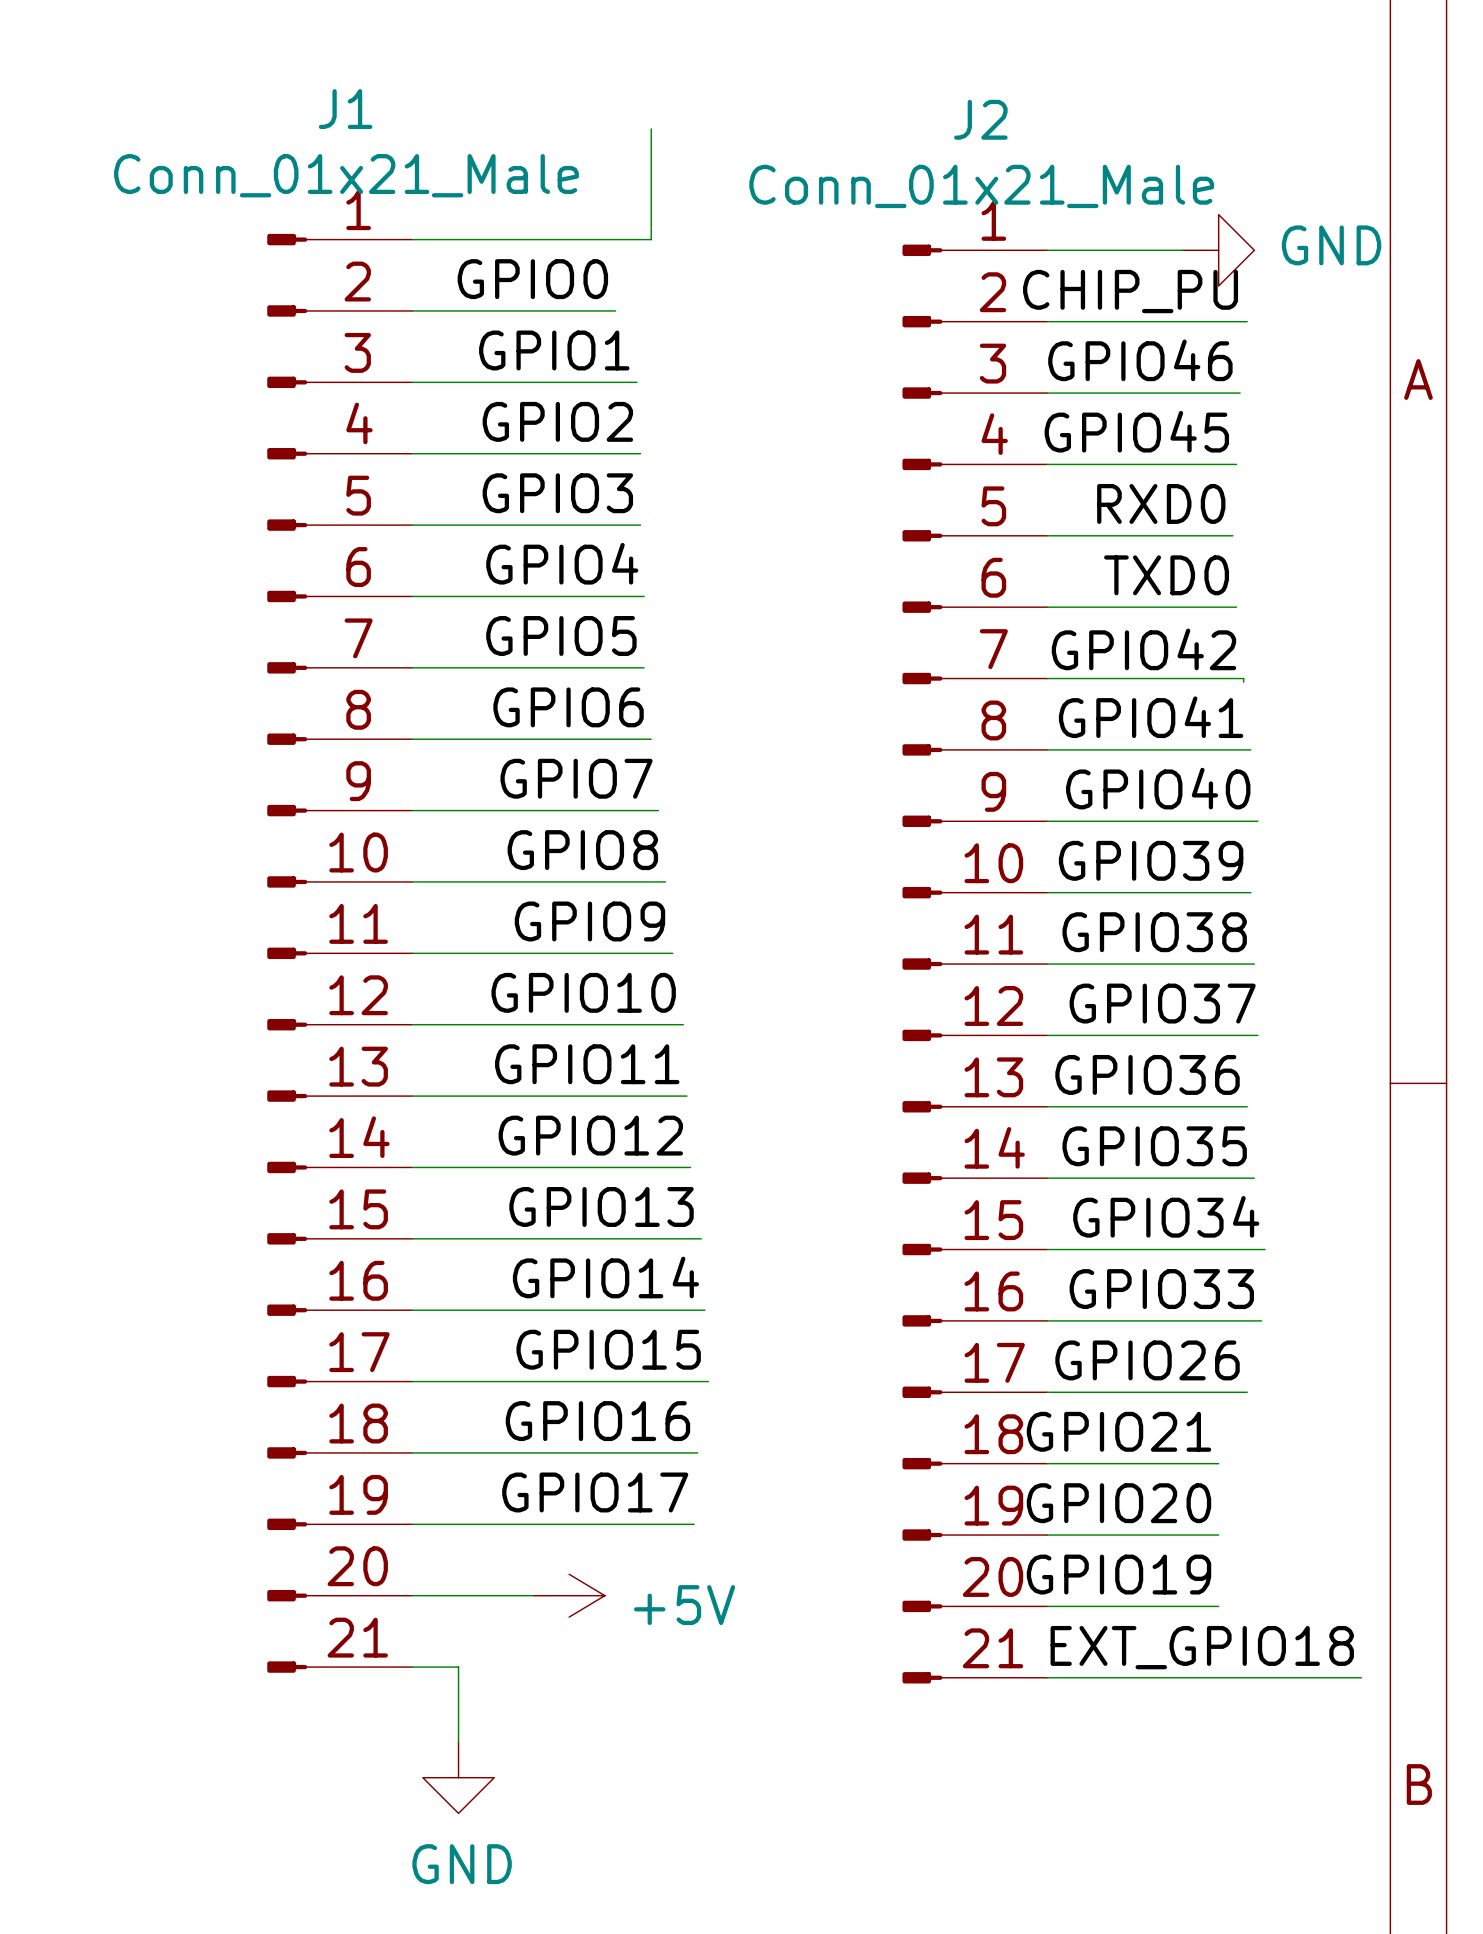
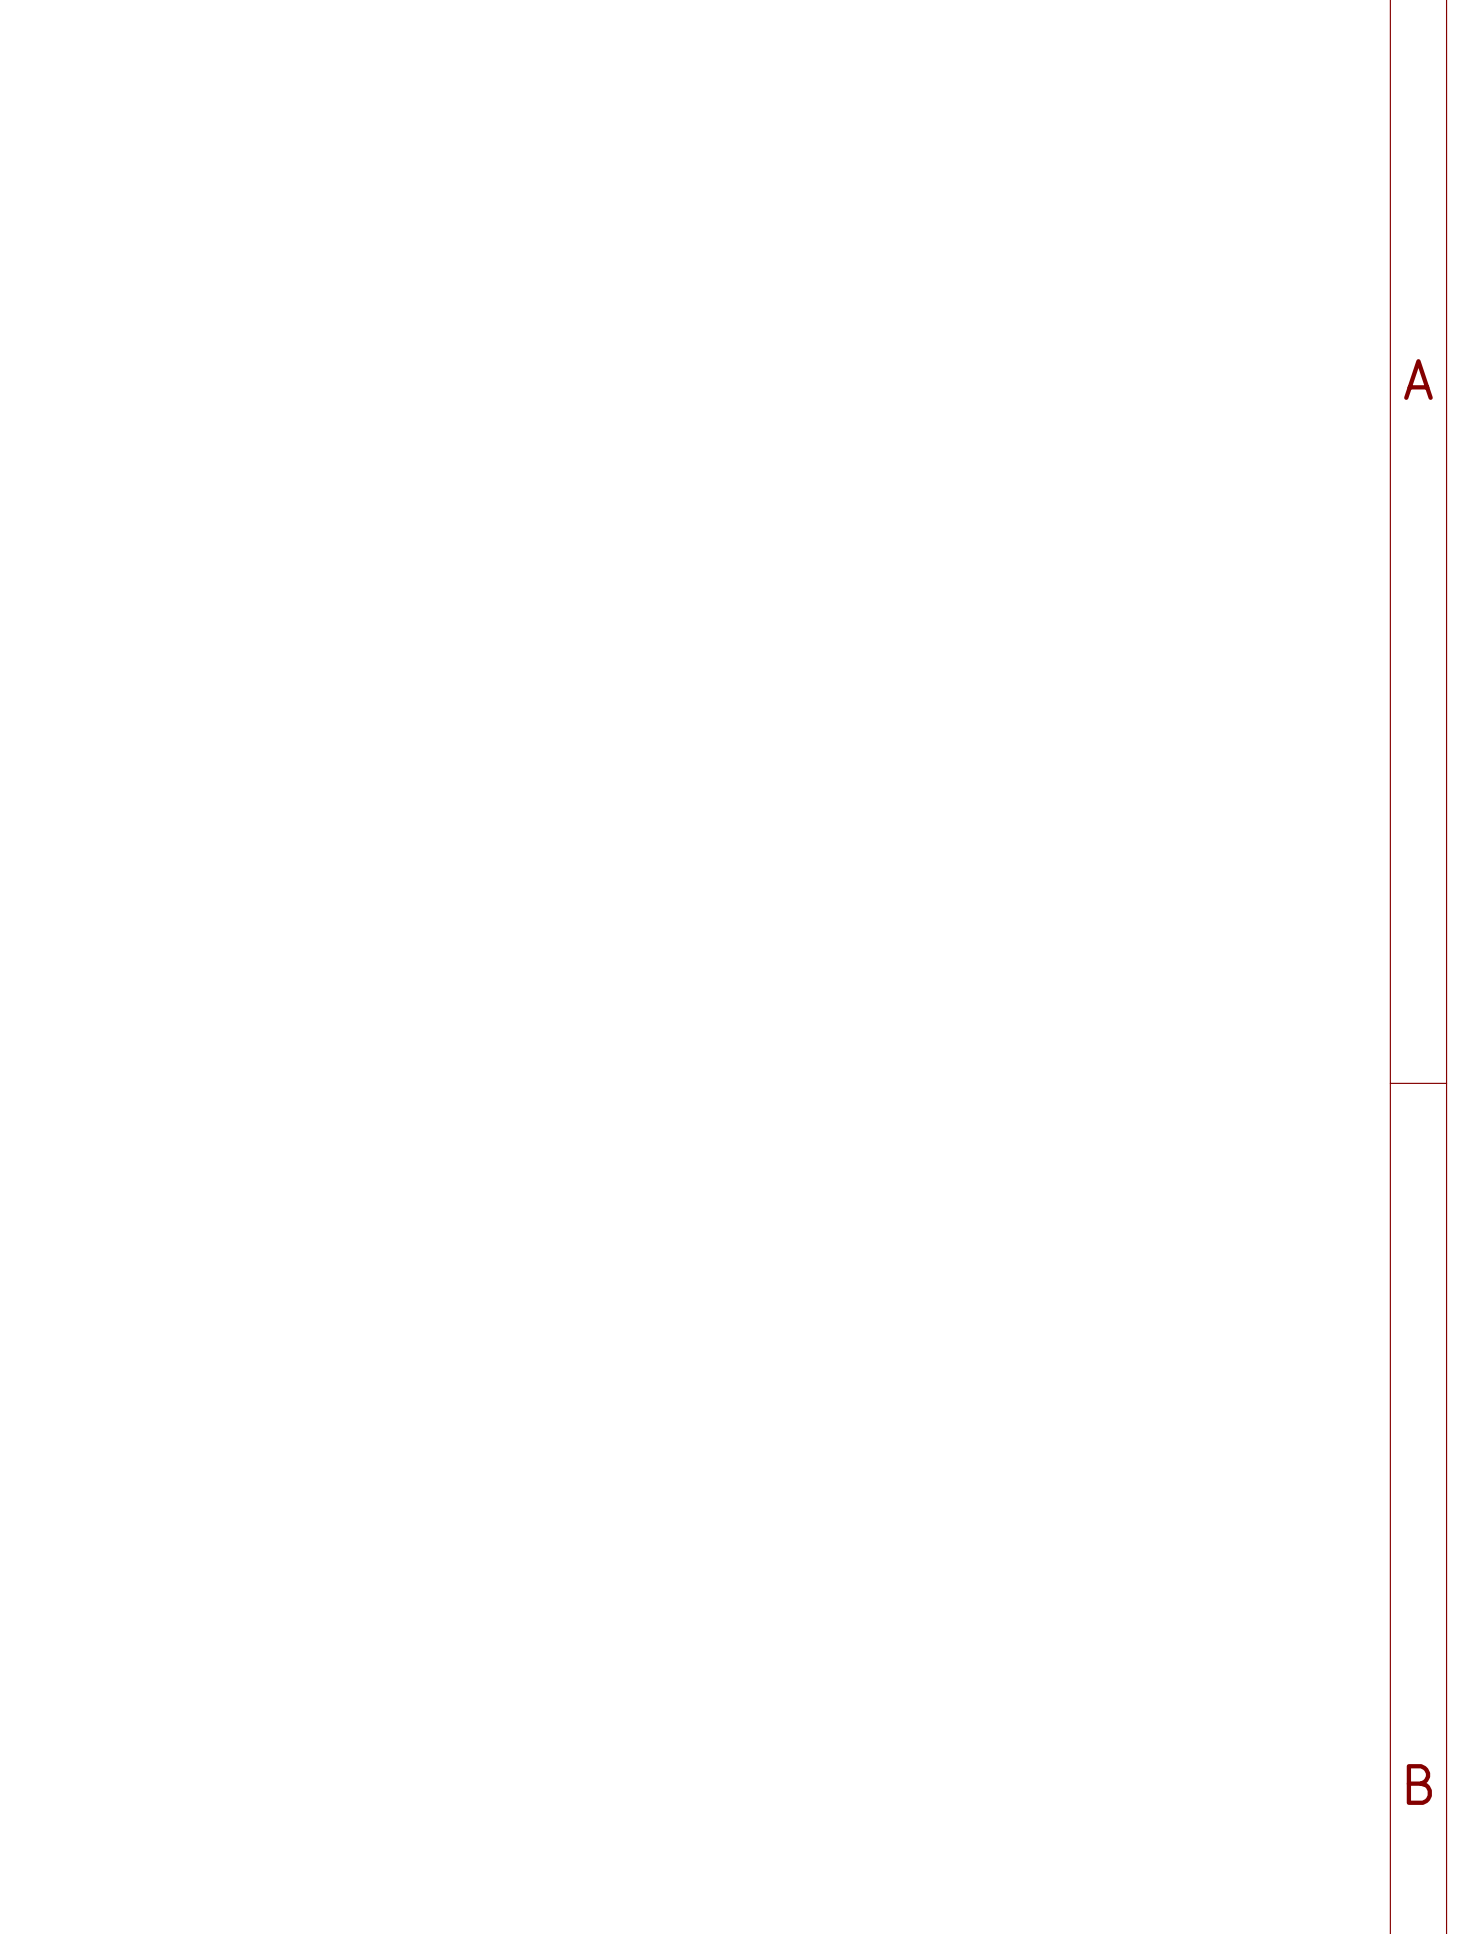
wire: (651, 128) (651, 239) (412, 239) -> none
wire: (1047, 250) (1182, 250) -> none
power symbol: GND (1218, 250) -> none
label: GPIO0 (532, 279) -> none
label: CHIP_PU (1130, 291) -> none
wire: (412, 310) (615, 310) -> none
wire: (1047, 321) (1247, 321) -> none
label: GPIO1 (554, 350) -> none
label: GPIO46 (1140, 360) -> none
wire: (412, 382) (636, 382) -> none
wire: (1047, 393) (1240, 393) -> none
label: GPIO2 (557, 421) -> none
label: GPIO45 (1136, 431) -> none
wire: (412, 453) (640, 453) -> none
wire: (1047, 464) (1236, 464) -> none
label: GPIO3 (557, 493) -> none
label: RXD0 (1161, 503) -> none
wire: (412, 525) (640, 525) -> none
wire: (1047, 535) (1232, 535) -> none
label: GPIO4 (562, 563) -> none
label: TXD0 (1166, 575) -> none
wire: (412, 596) (644, 596) -> none
wire: (1047, 607) (1236, 607) -> none
label: GPIO5 (561, 635) -> none
label: GPIO42 (1143, 649) -> none
wire: (412, 667) (644, 667) -> none
wire: (1047, 678) (1243, 678) (1243, 682) -> none
label: GPIO6 (568, 707) -> none
label: GPIO41 (1151, 717) -> none
wire: (412, 739) (651, 739) -> none
wire: (1047, 749) (1250, 749) -> none
label: GPIO7 (576, 778) -> none
label: GPIO40 (1158, 788) -> none
wire: (412, 810) (658, 810) -> none
wire: (1047, 821) (1257, 821) -> none
label: GPIO8 (582, 850) -> none
label: GPIO39 (1151, 860) -> none
wire: (412, 881) (665, 881) -> none
wire: (1047, 892) (1250, 892) -> none
label: GPIO9 (589, 921) -> none
label: GPIO38 (1154, 932) -> none
J1: Conn_01x21_Male (339, 953) -> none
wire: (412, 953) (672, 953) -> none
J2: Conn_01x21_Male (974, 964) -> none
wire: (1047, 964) (1254, 964) -> none
label: GPIO10 (583, 992) -> none
label: GPIO37 (1162, 1003) -> none
wire: (412, 1024) (683, 1024) -> none
wire: (1047, 1035) (1257, 1035) -> none
label: GPIO11 (587, 1064) -> none
label: GPIO36 (1147, 1074) -> none
wire: (412, 1096) (686, 1096) -> none
wire: (1047, 1106) (1247, 1106) -> none
label: GPIO12 (590, 1135) -> none
label: GPIO35 (1154, 1146) -> none
wire: (412, 1167) (690, 1167) -> none
wire: (1047, 1178) (1254, 1178) -> none
label: GPIO13 (601, 1206) -> none
label: GPIO34 (1166, 1216) -> none
wire: (412, 1238) (701, 1238) -> none
wire: (1047, 1249) (1265, 1249) -> none
label: GPIO14 (605, 1277) -> none
label: GPIO33 (1161, 1289) -> none
wire: (412, 1310) (704, 1310) -> none
wire: (1047, 1320) (1261, 1320) -> none
label: GPIO15 (608, 1349) -> none
label: GPIO26 (1147, 1360) -> none
wire: (412, 1381) (708, 1381) -> none
wire: (1047, 1392) (1247, 1392) -> none
label: GPIO16 (597, 1421) -> none
label: GPIO21 (1118, 1431) -> none
wire: (412, 1452) (697, 1452) -> none
wire: (1047, 1463) (1218, 1463) -> none
label: GPIO17 (595, 1492) -> none
label: GPIO20 (1118, 1503) -> none
wire: (412, 1524) (694, 1524) -> none
wire: (1047, 1535) (1218, 1535) -> none
label: GPIO19 (1118, 1574) -> none
wire: (412, 1595) (533, 1595) -> none
power symbol: +5V (569, 1595) -> none
wire: (1047, 1606) (1218, 1606) -> none
label: EXT_GPIO18 (1202, 1647) -> none
wire: (412, 1667) (458, 1667) (458, 1742) -> none
wire: (1047, 1677) (1361, 1677) -> none
power symbol: GND (458, 1777) -> none

